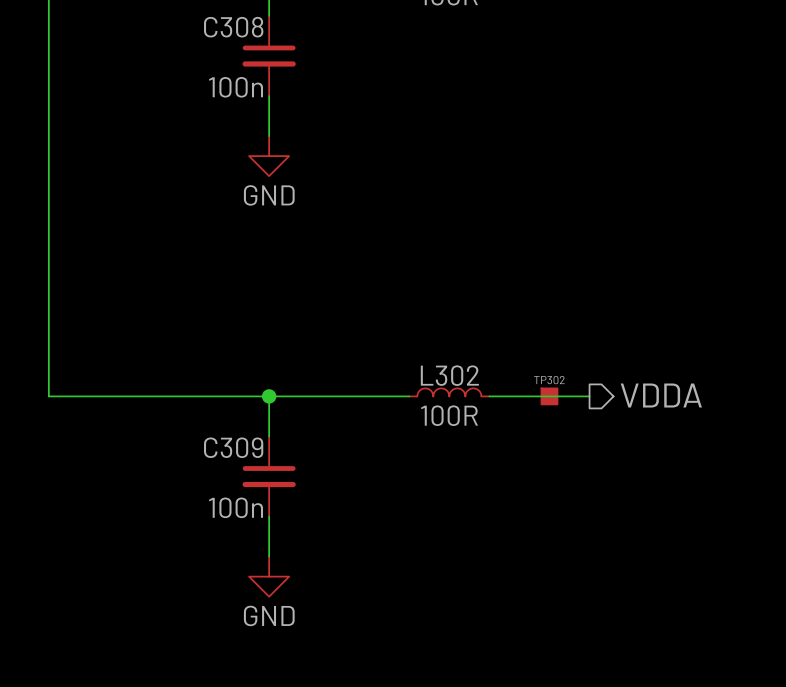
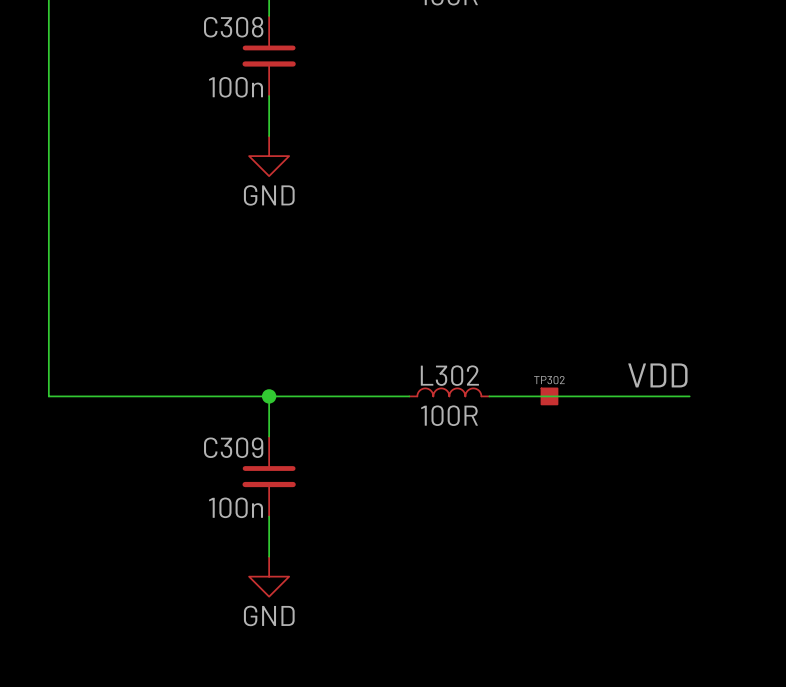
label: none -> VDD (657, 375)
hierarchical label: VDDA (661, 395) -> none
wire: none -> (589, 396) (689, 396)

